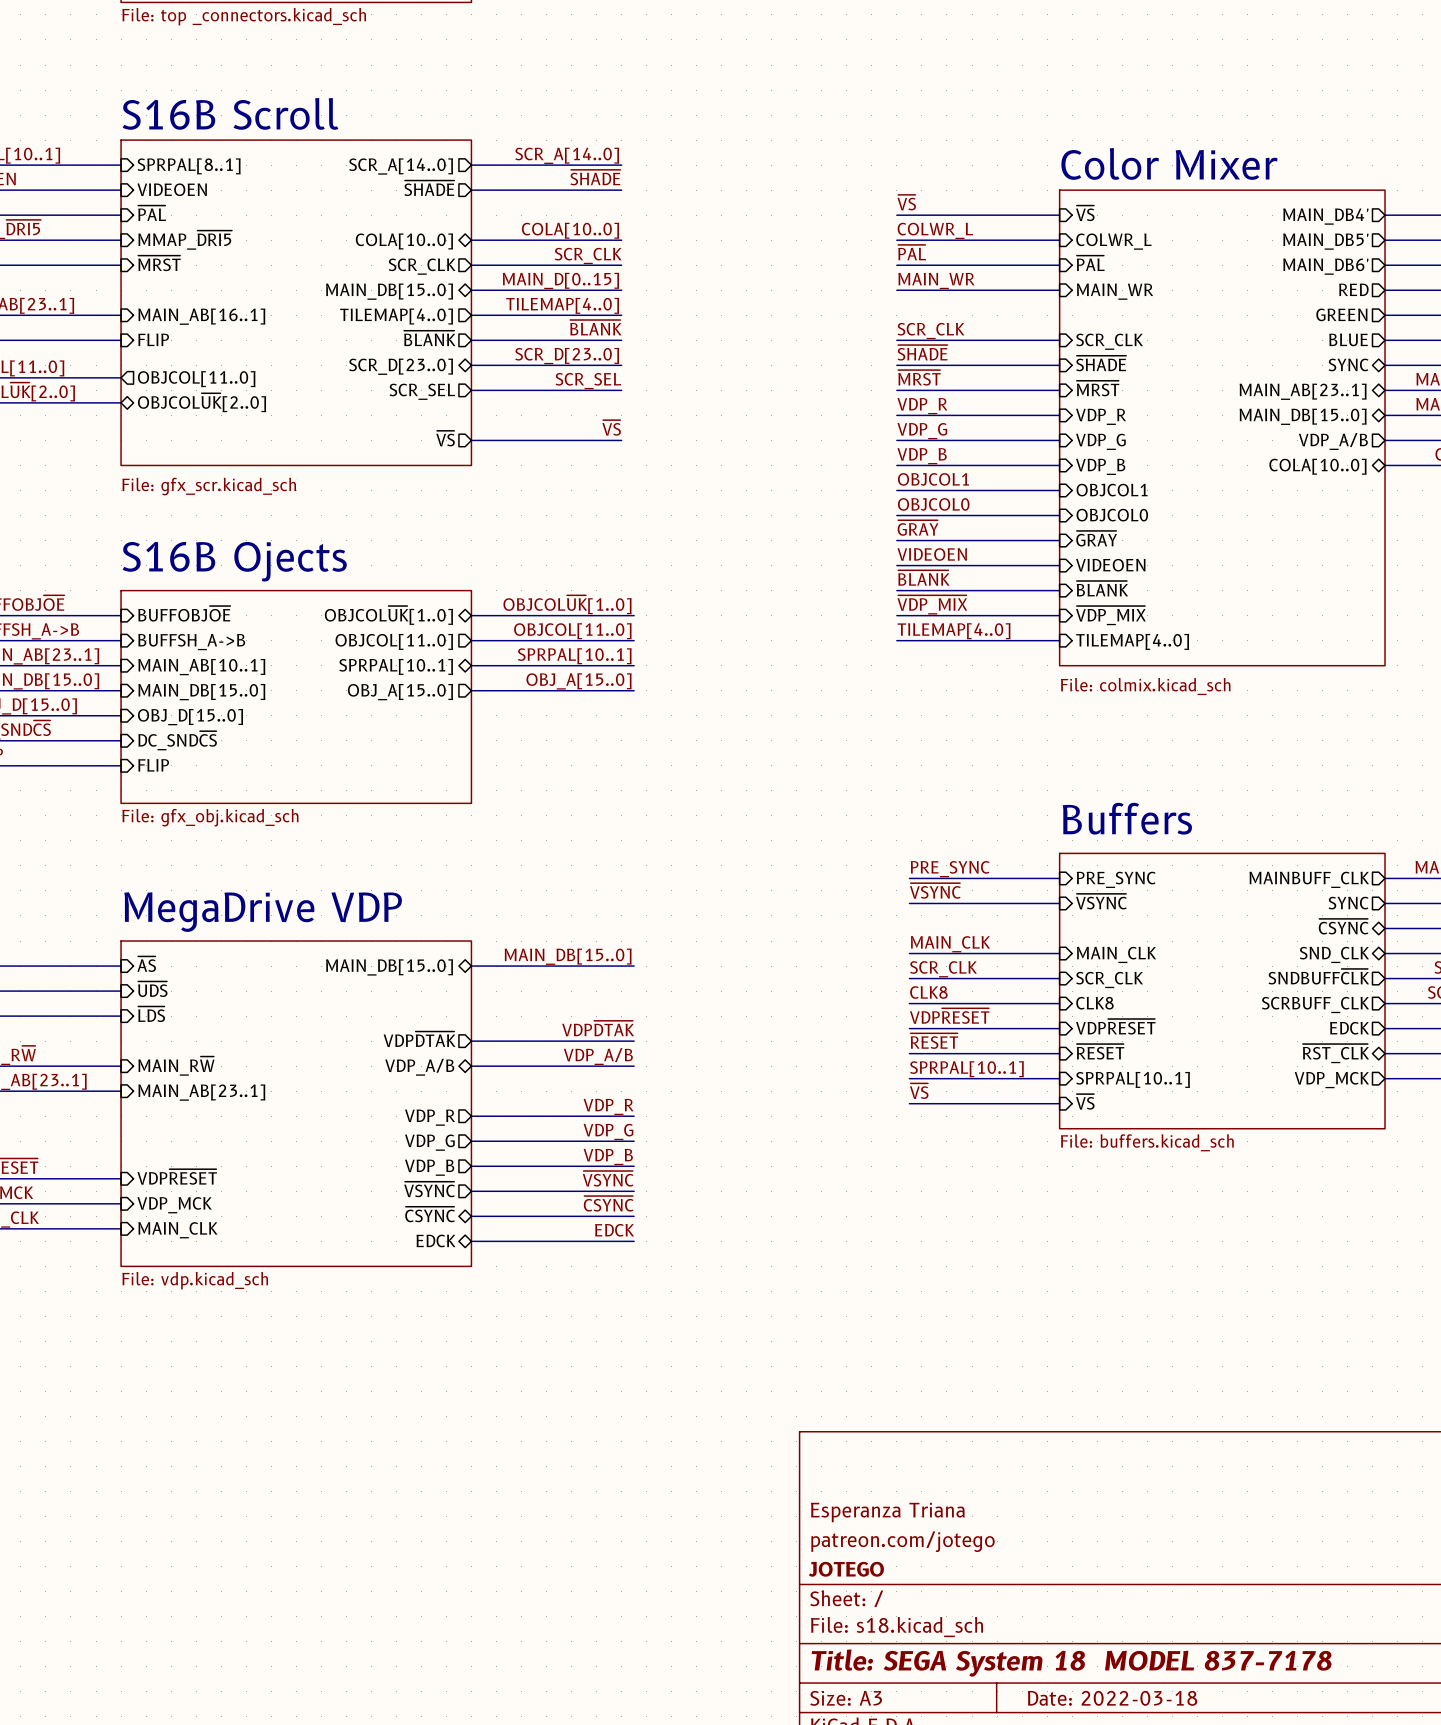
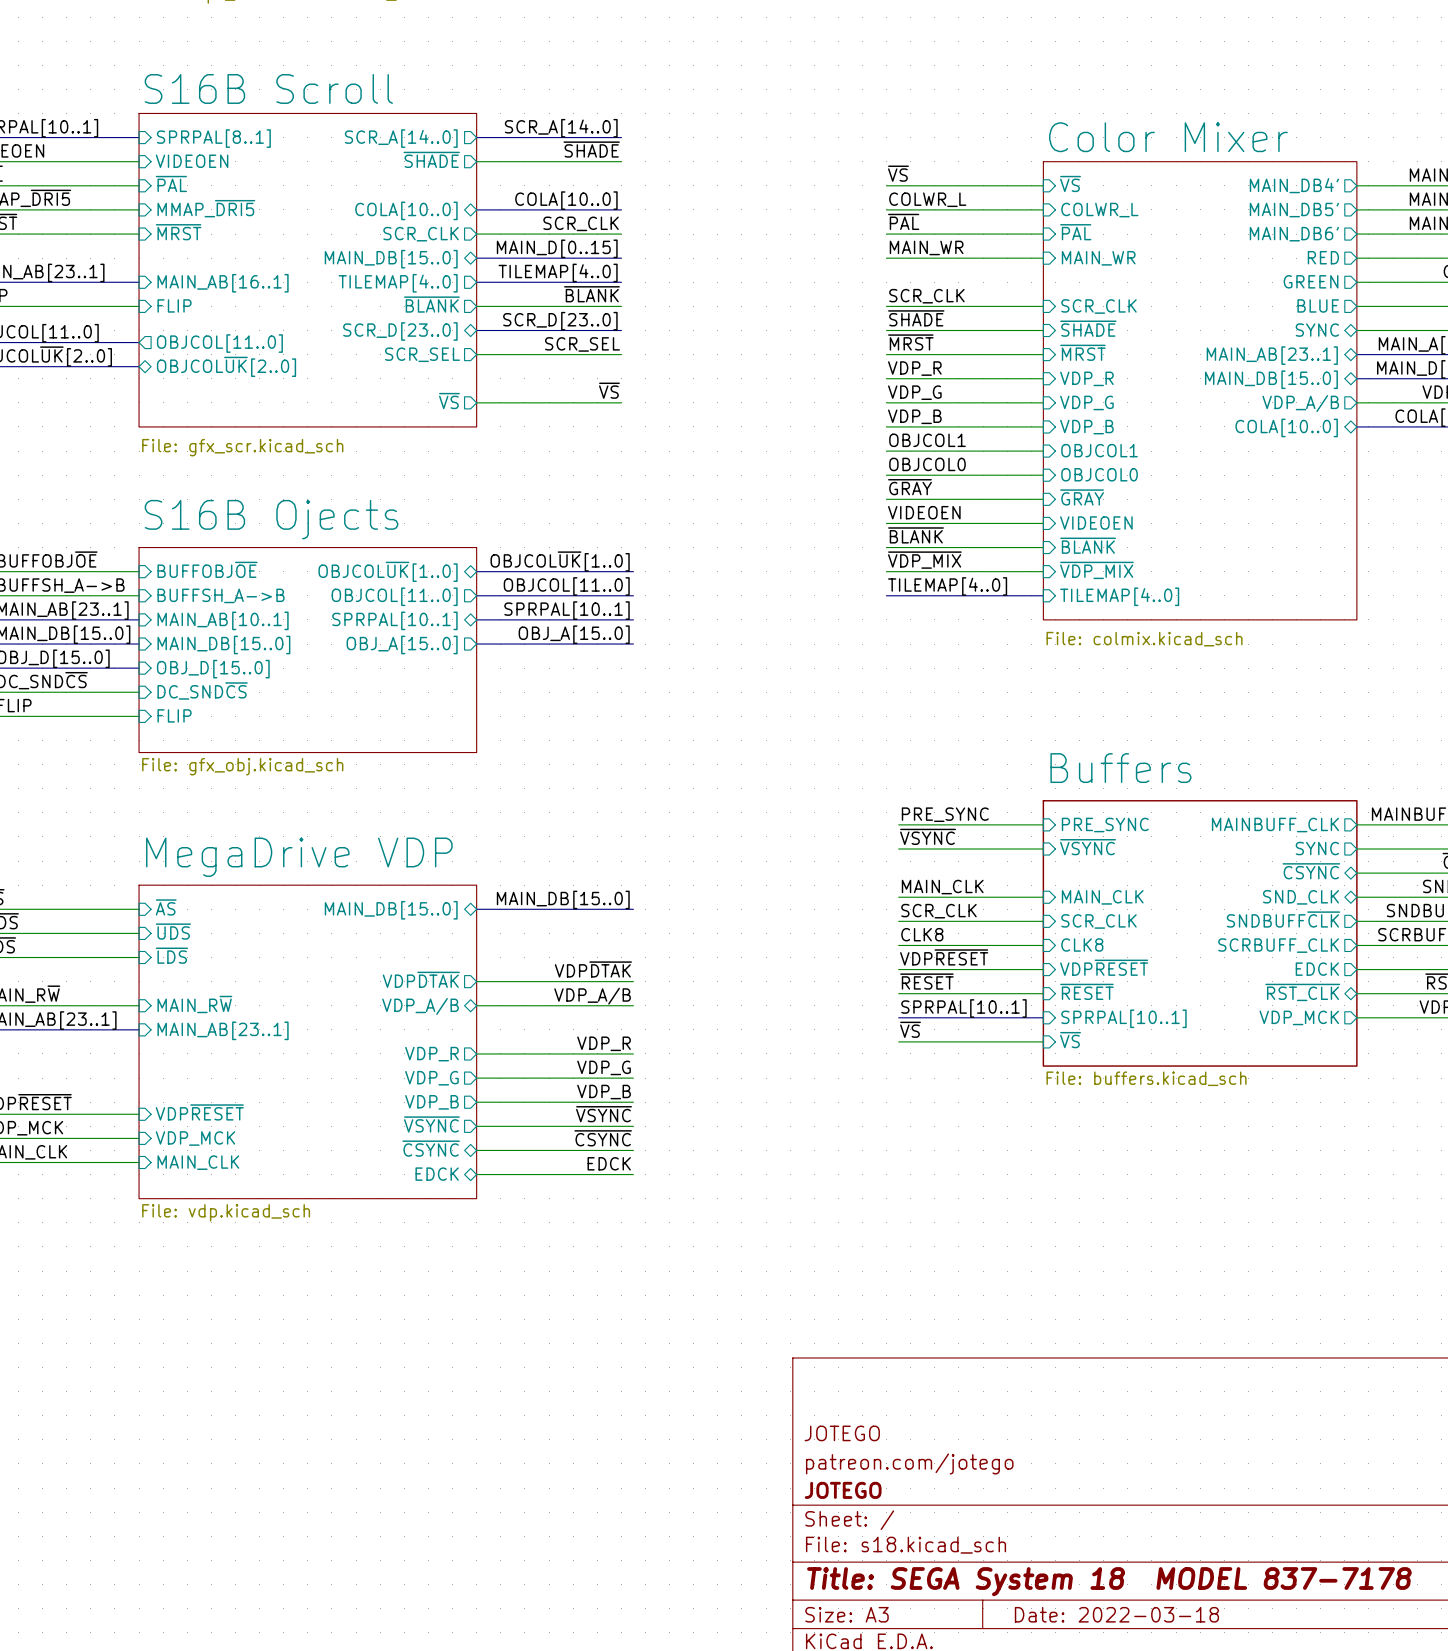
title block: Esperanza Triana (887, 1512) -> JOTEGO (842, 1433)

